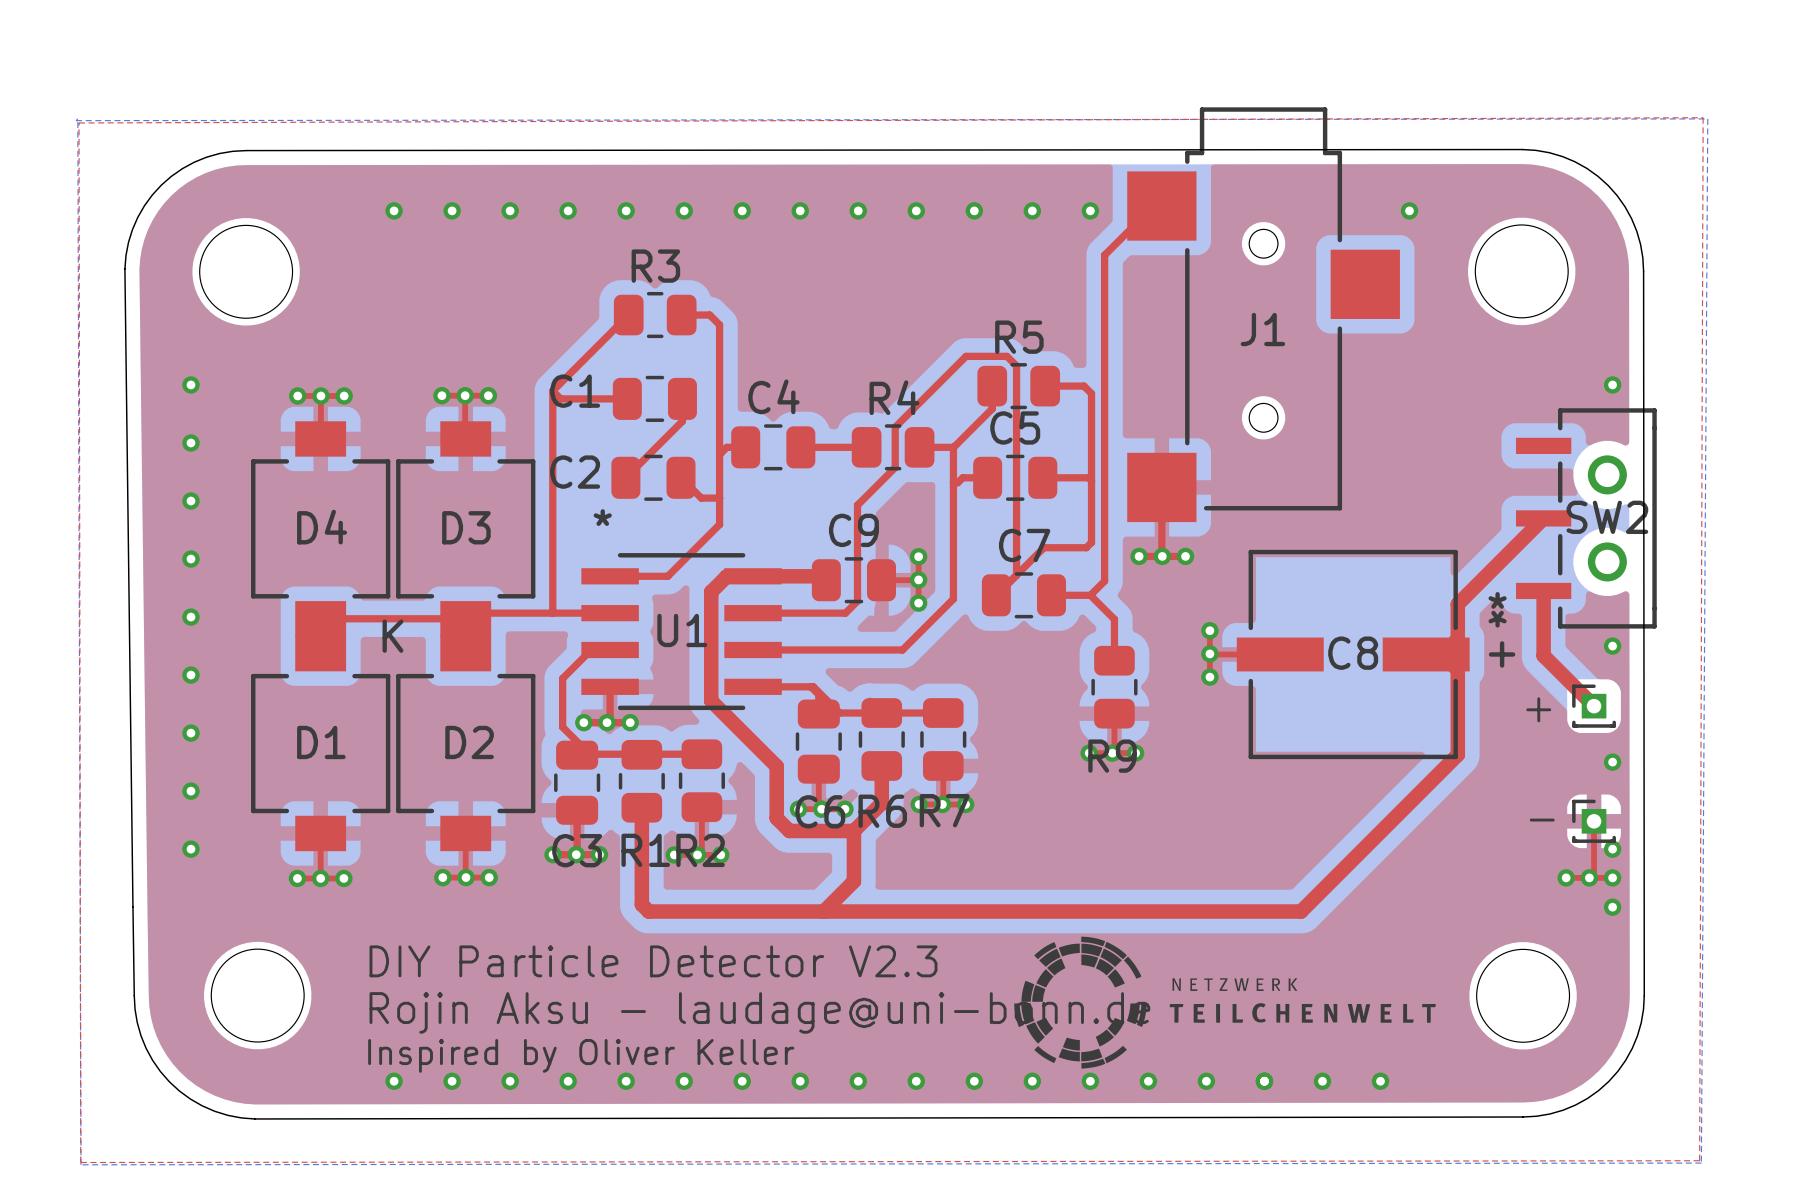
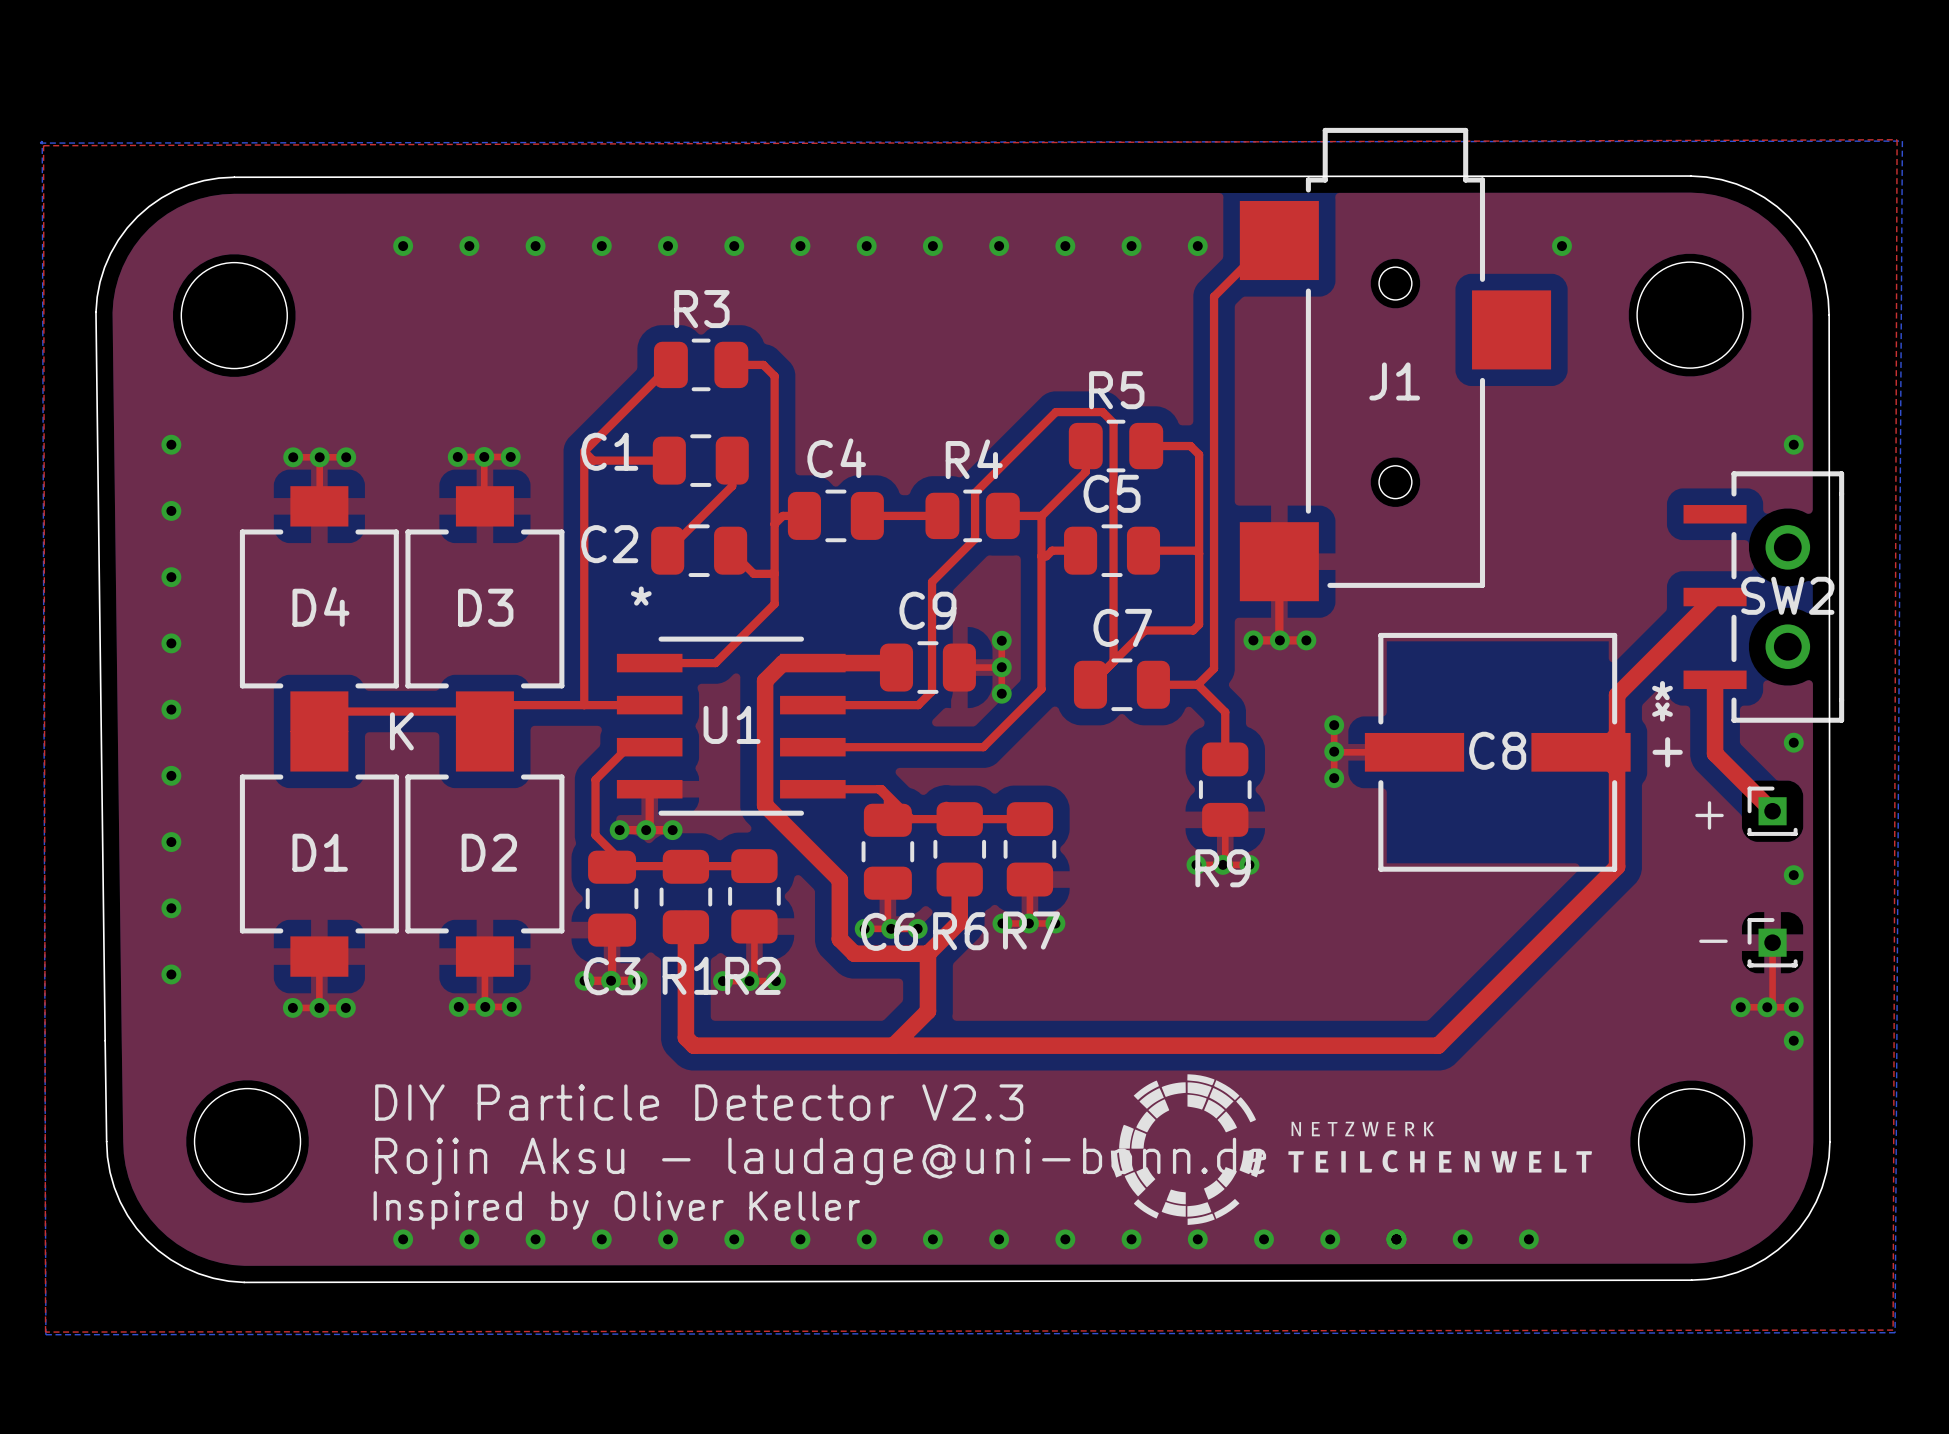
via: (1612, 849) -> none

